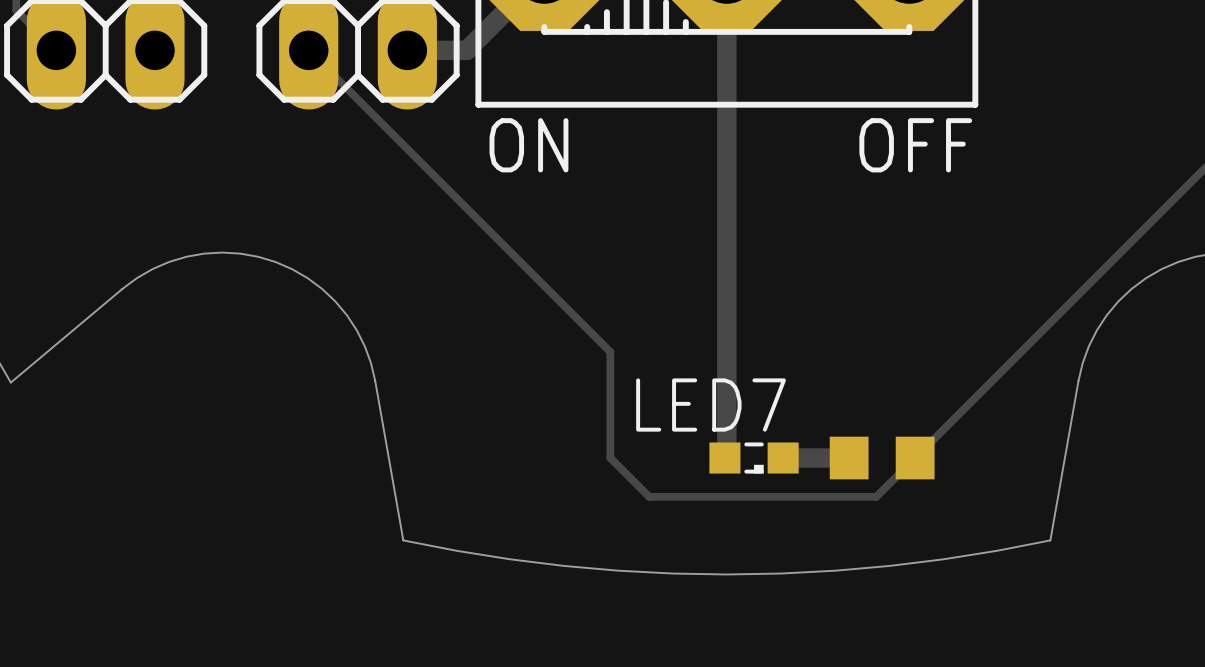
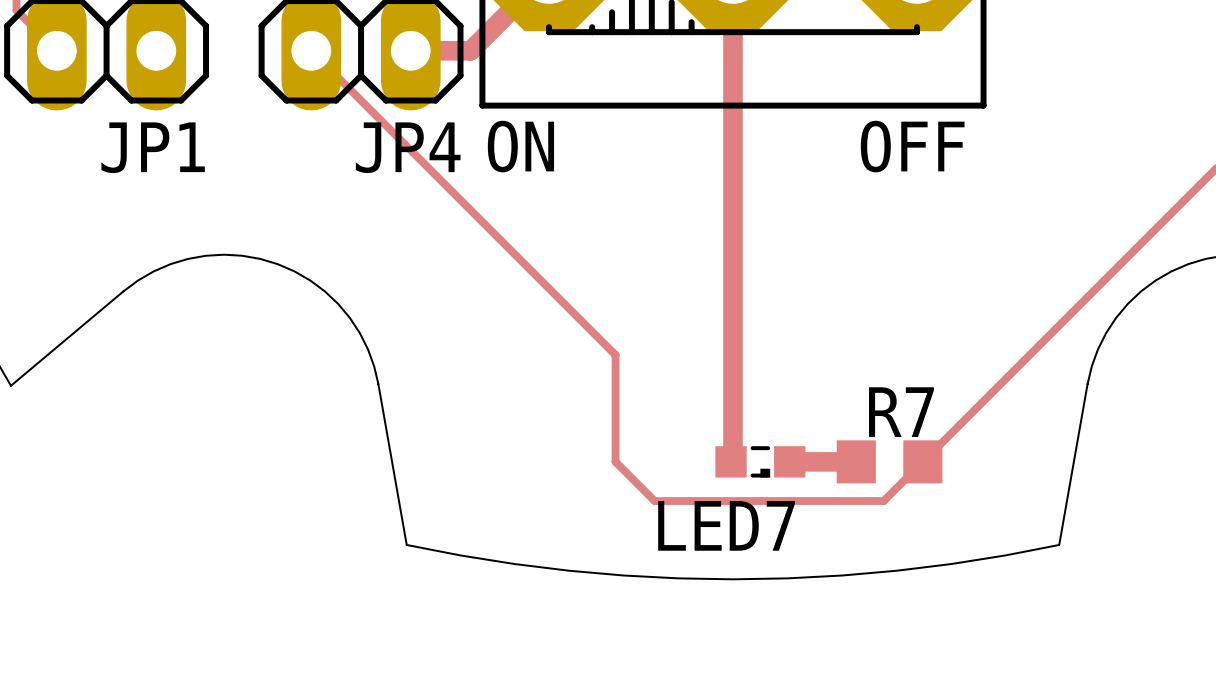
JP4 name: none -> JP4 (408, 147)
JP1 name: none -> JP1 (153, 147)
LED7 name position: LED7 (711, 405) -> LED7 (726, 525)
R7 name: none -> R7 (901, 412)

